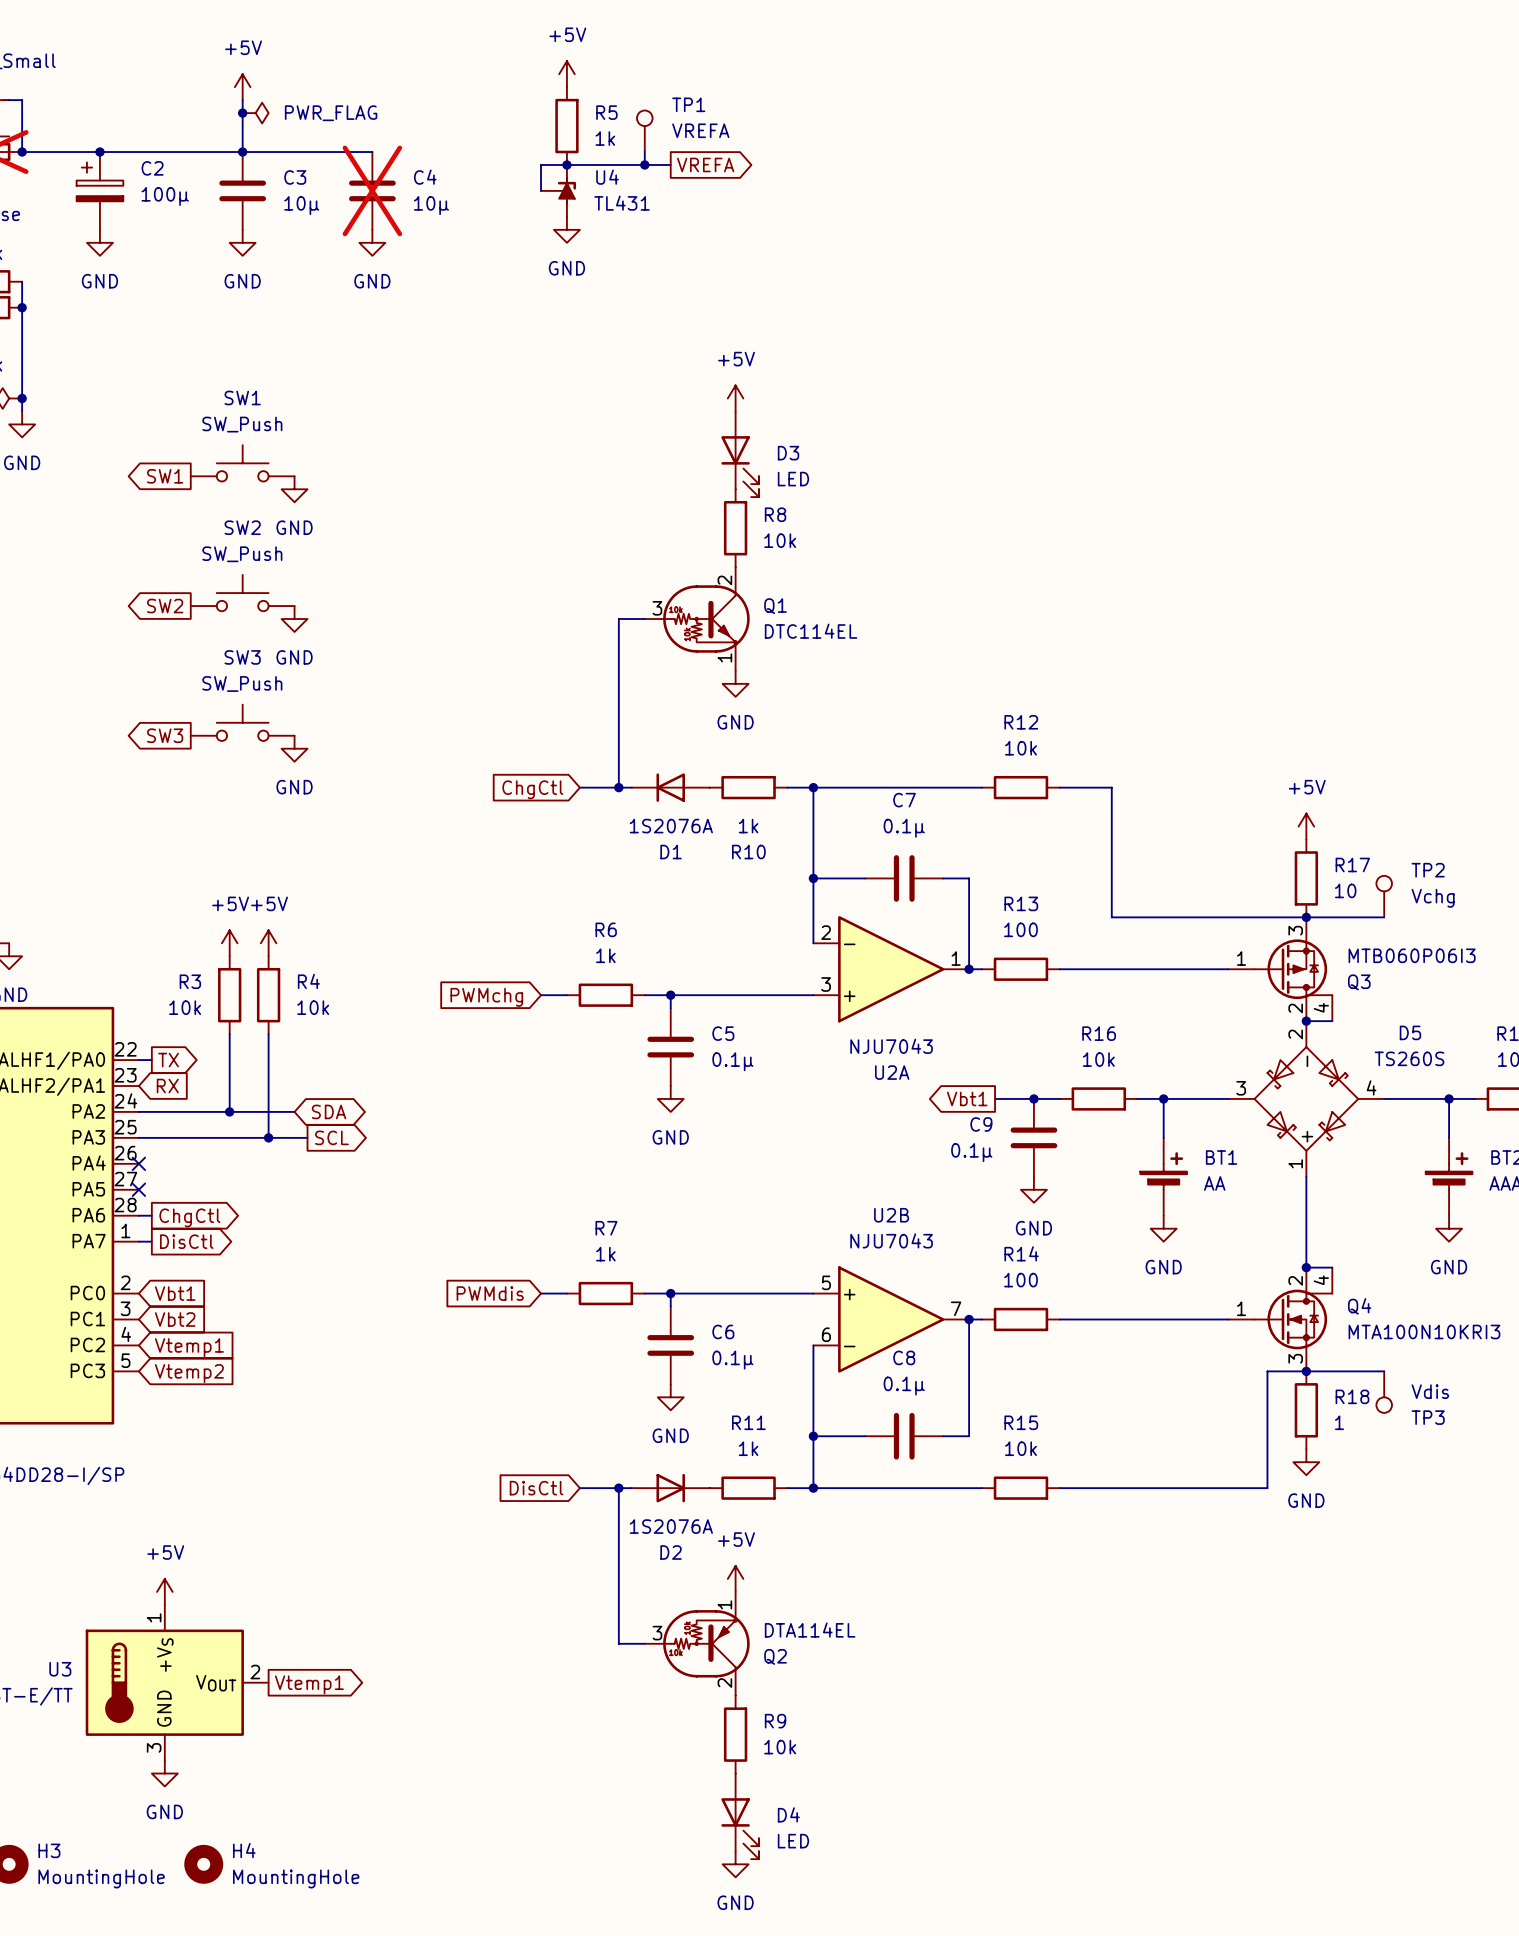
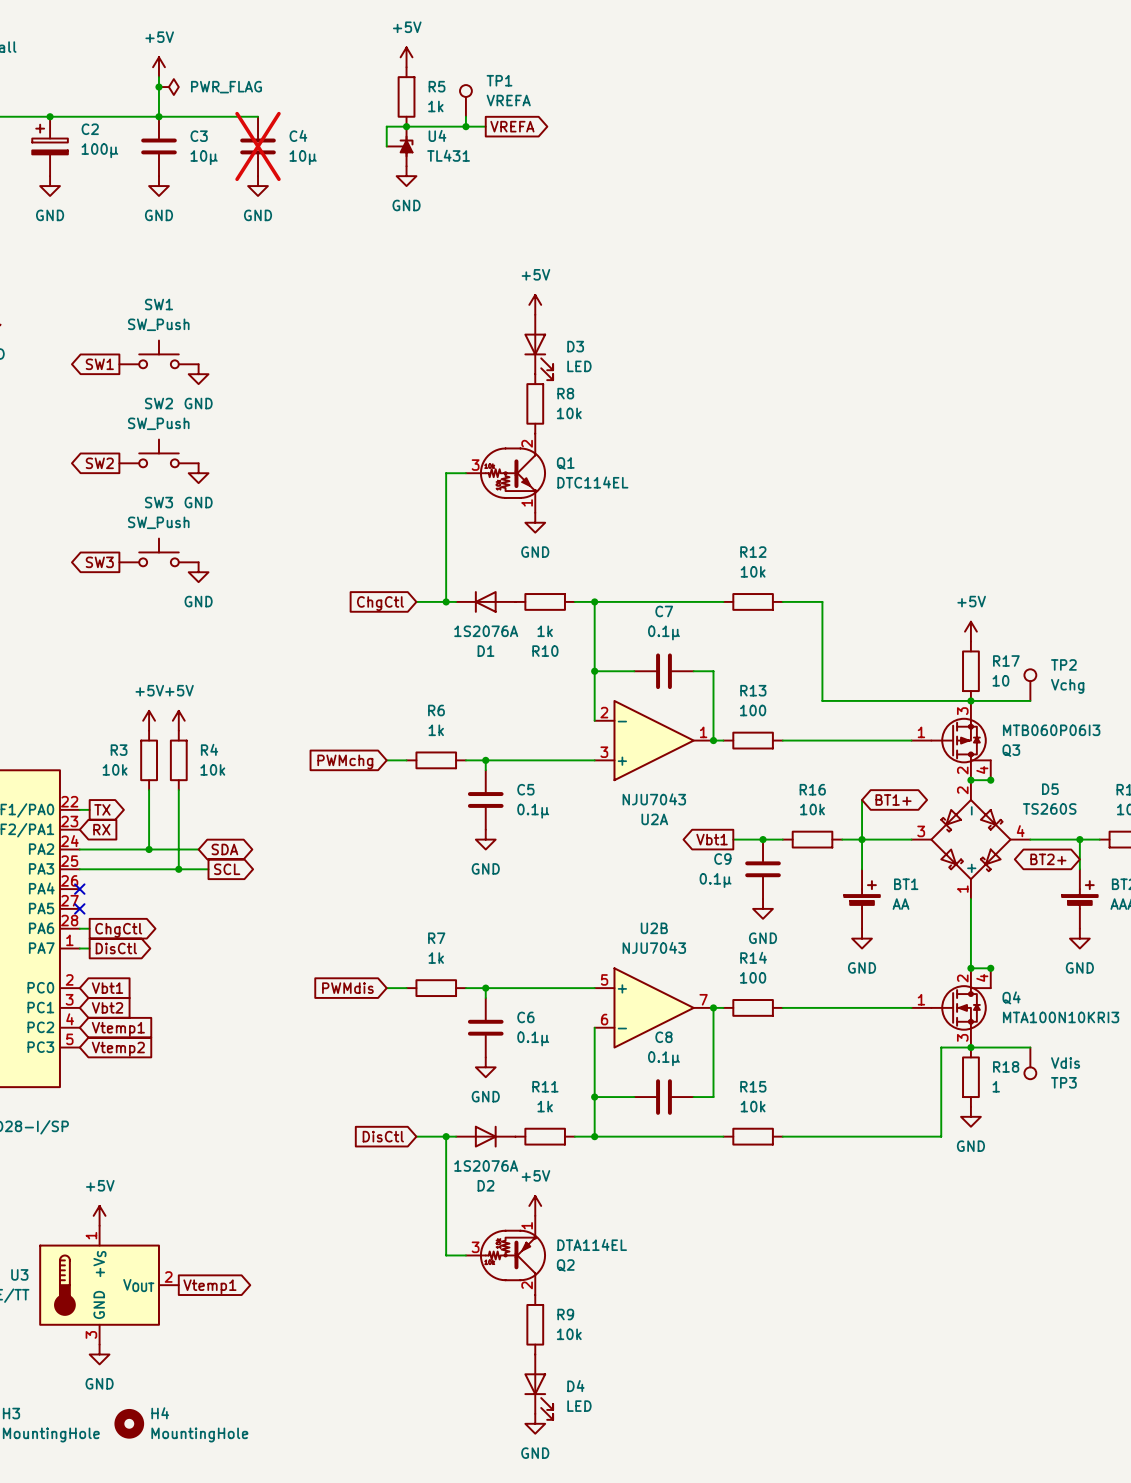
junction: none -> (990, 780)
wire: none -> (862, 799) (862, 839)
global label: none -> BT1+ (893, 799)
global label: none -> BT2+ (1048, 859)
junction: none -> (990, 968)

